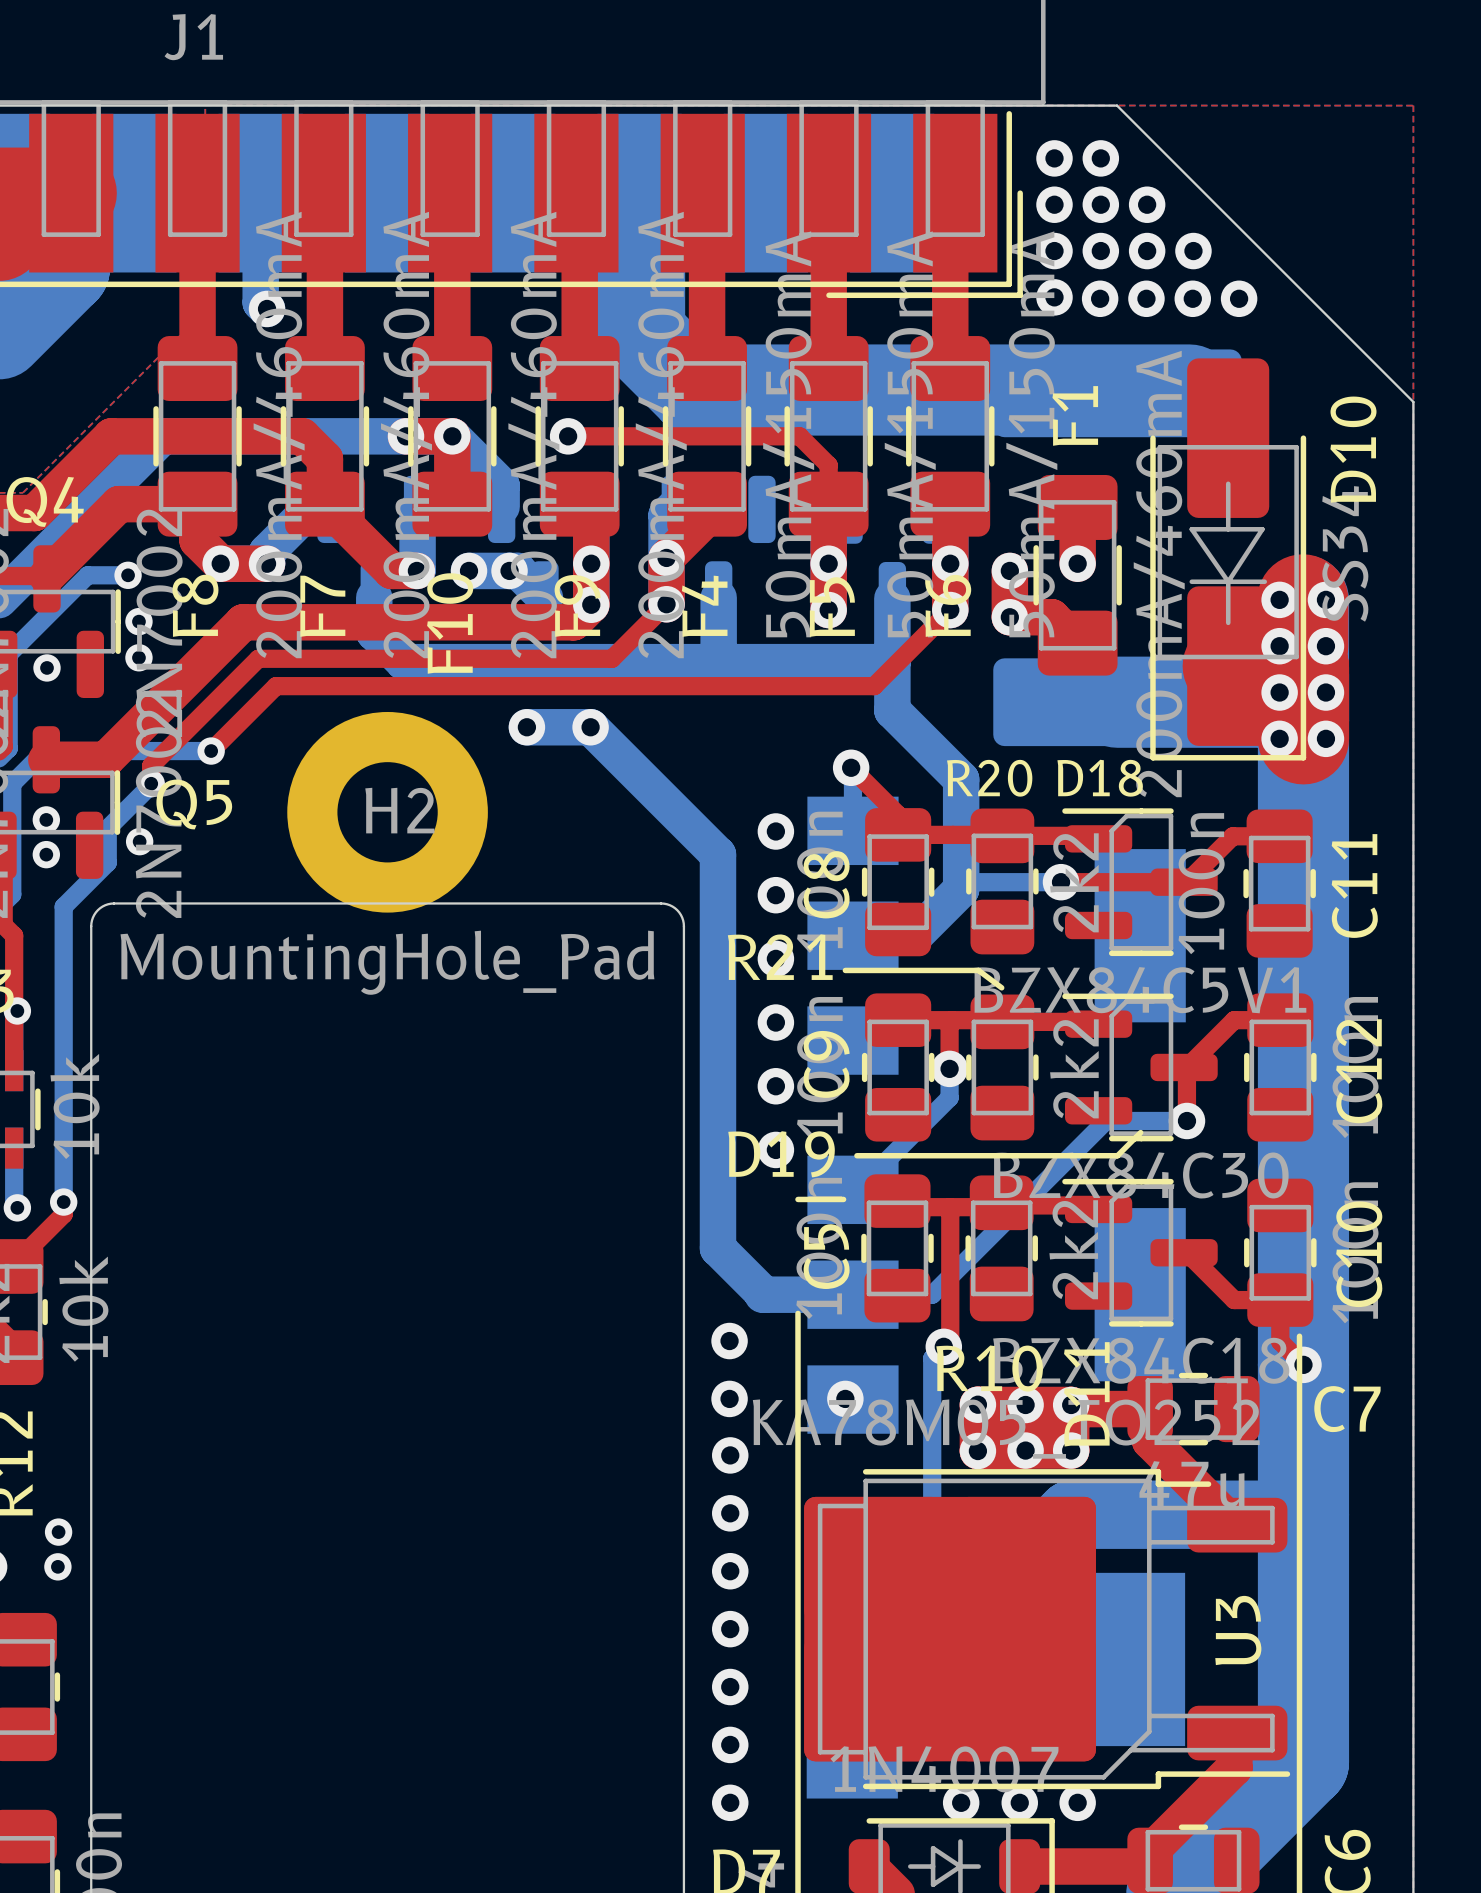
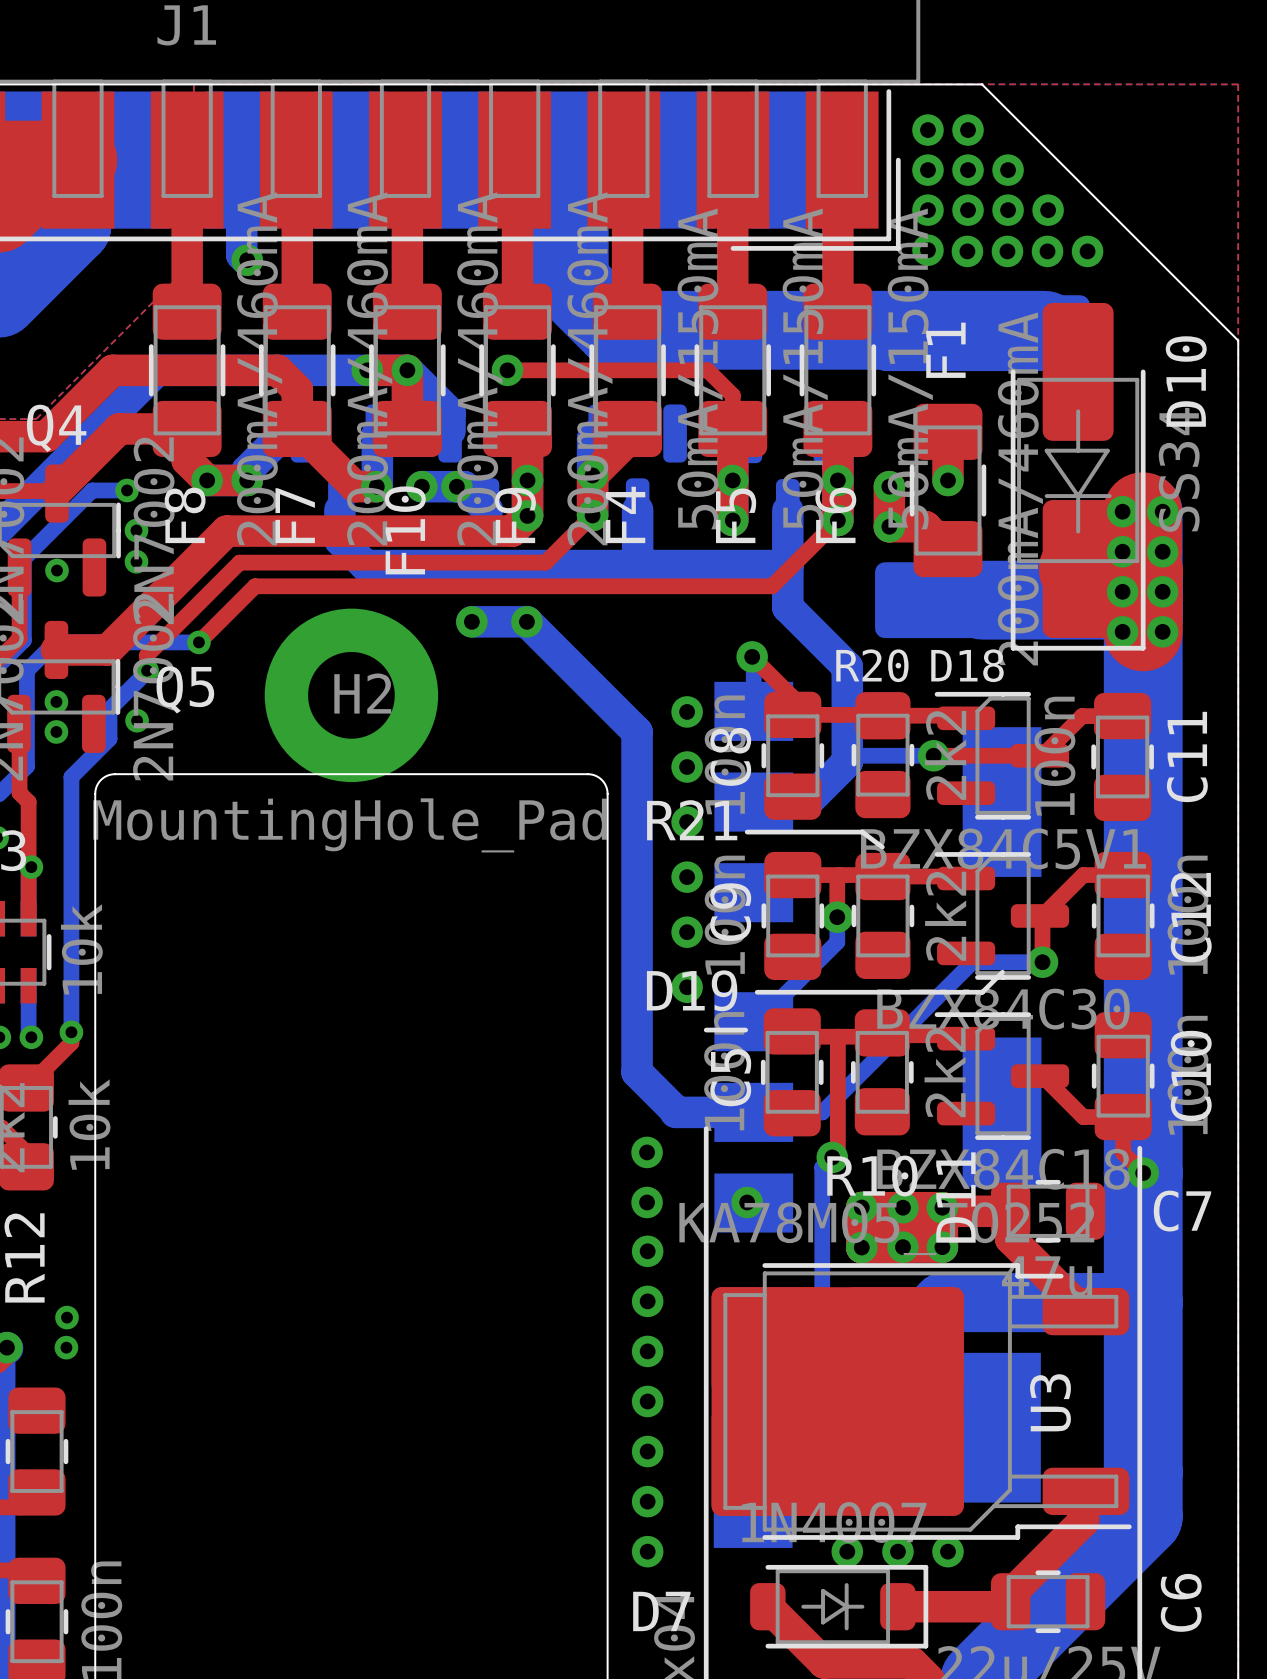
U3 name position: U3 (1238, 1630) -> U3 (1050, 1402)

